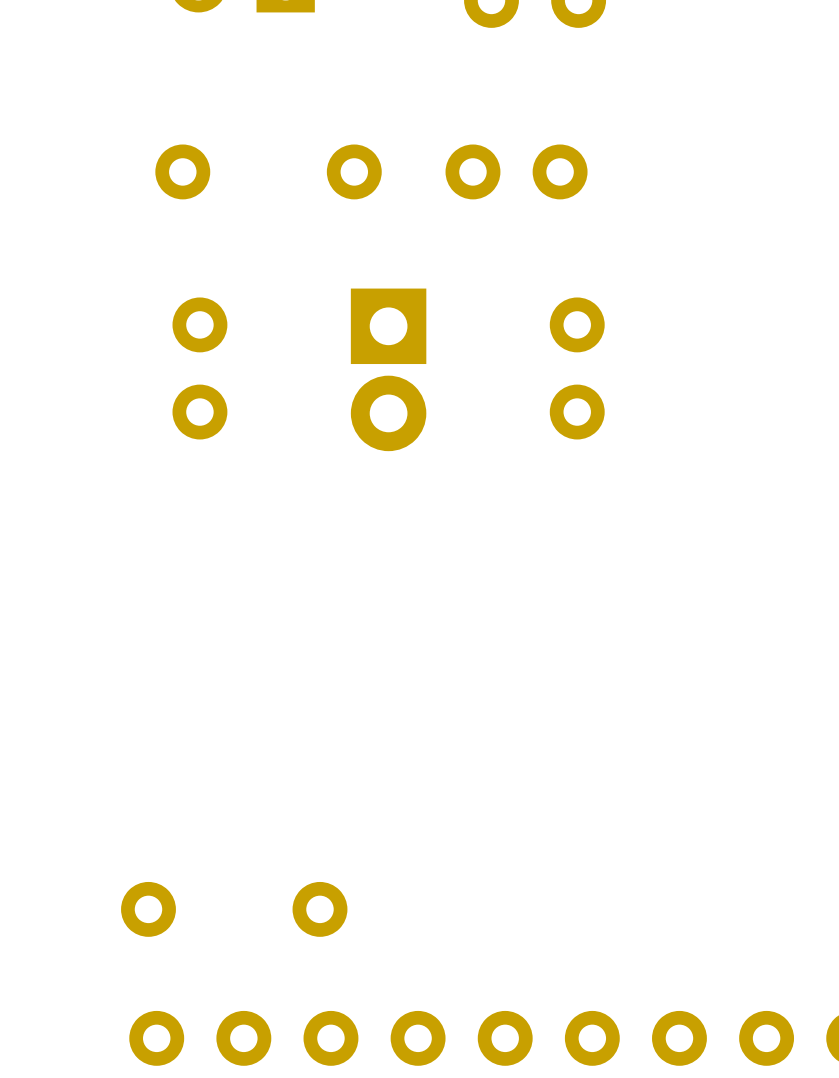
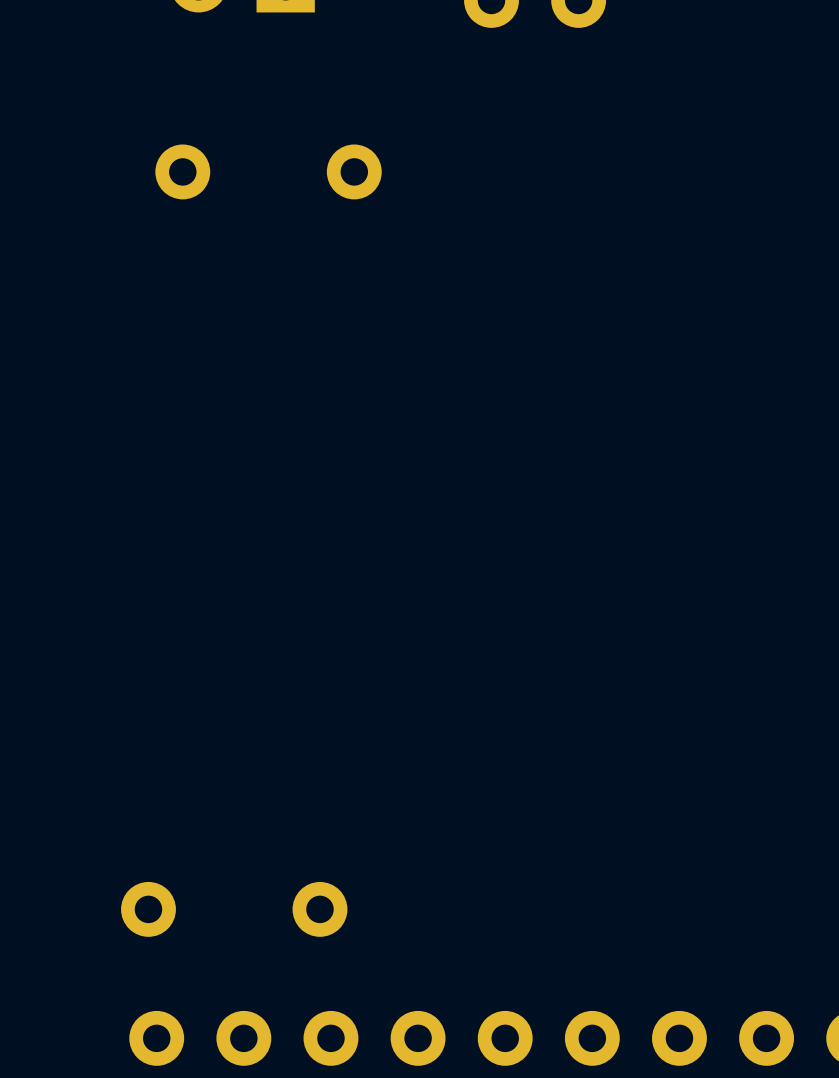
part: (516, 171) -> none
part: (199, 368) -> none
part: (577, 368) -> none
part: (388, 369) -> none

